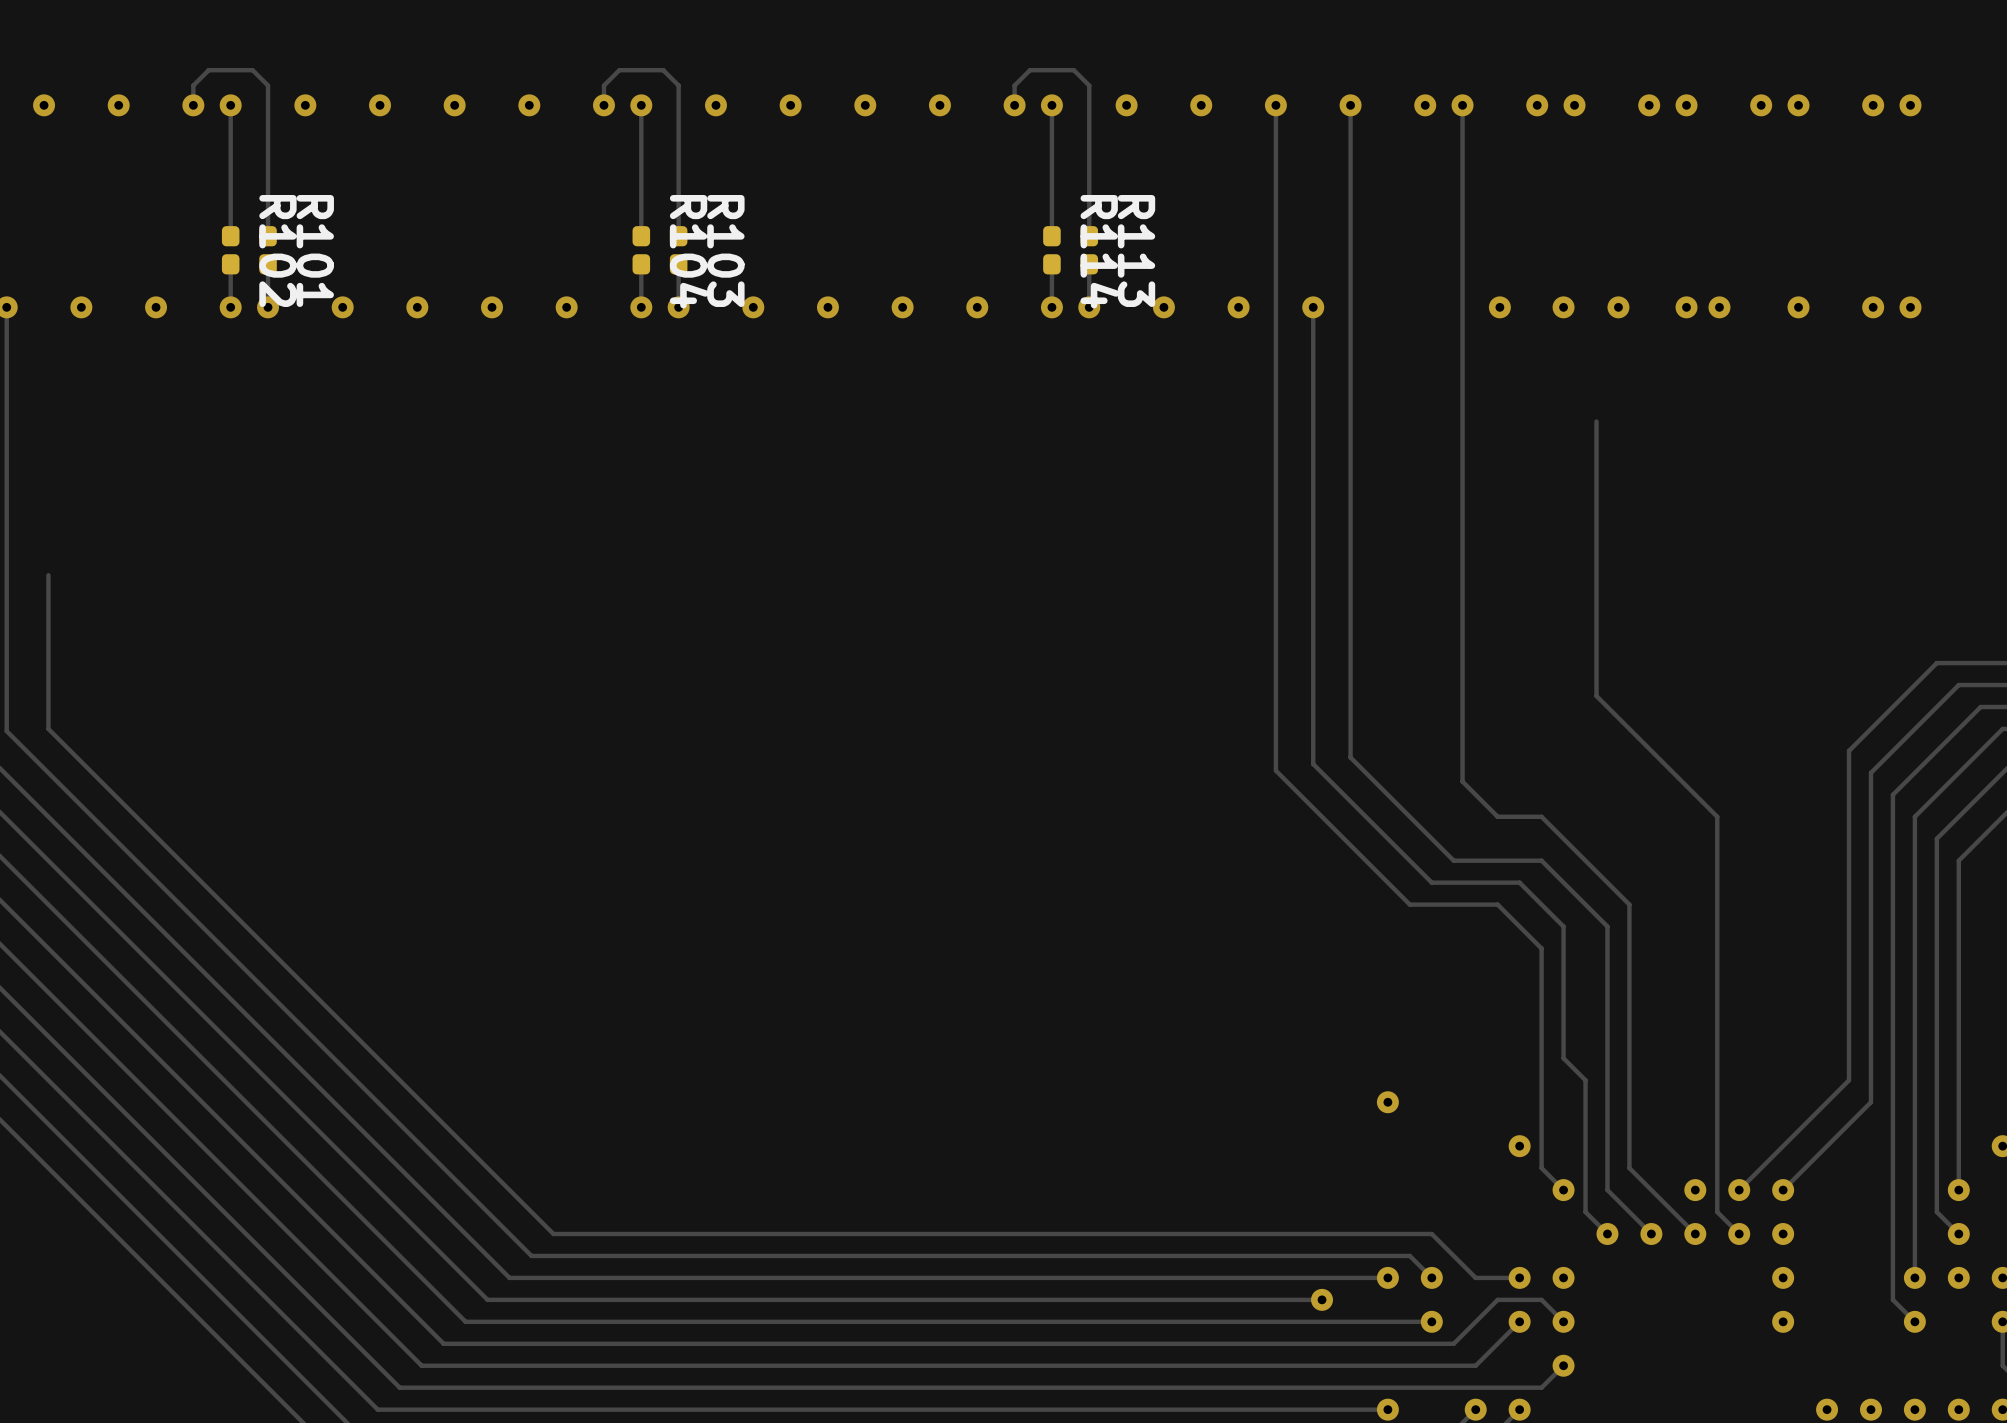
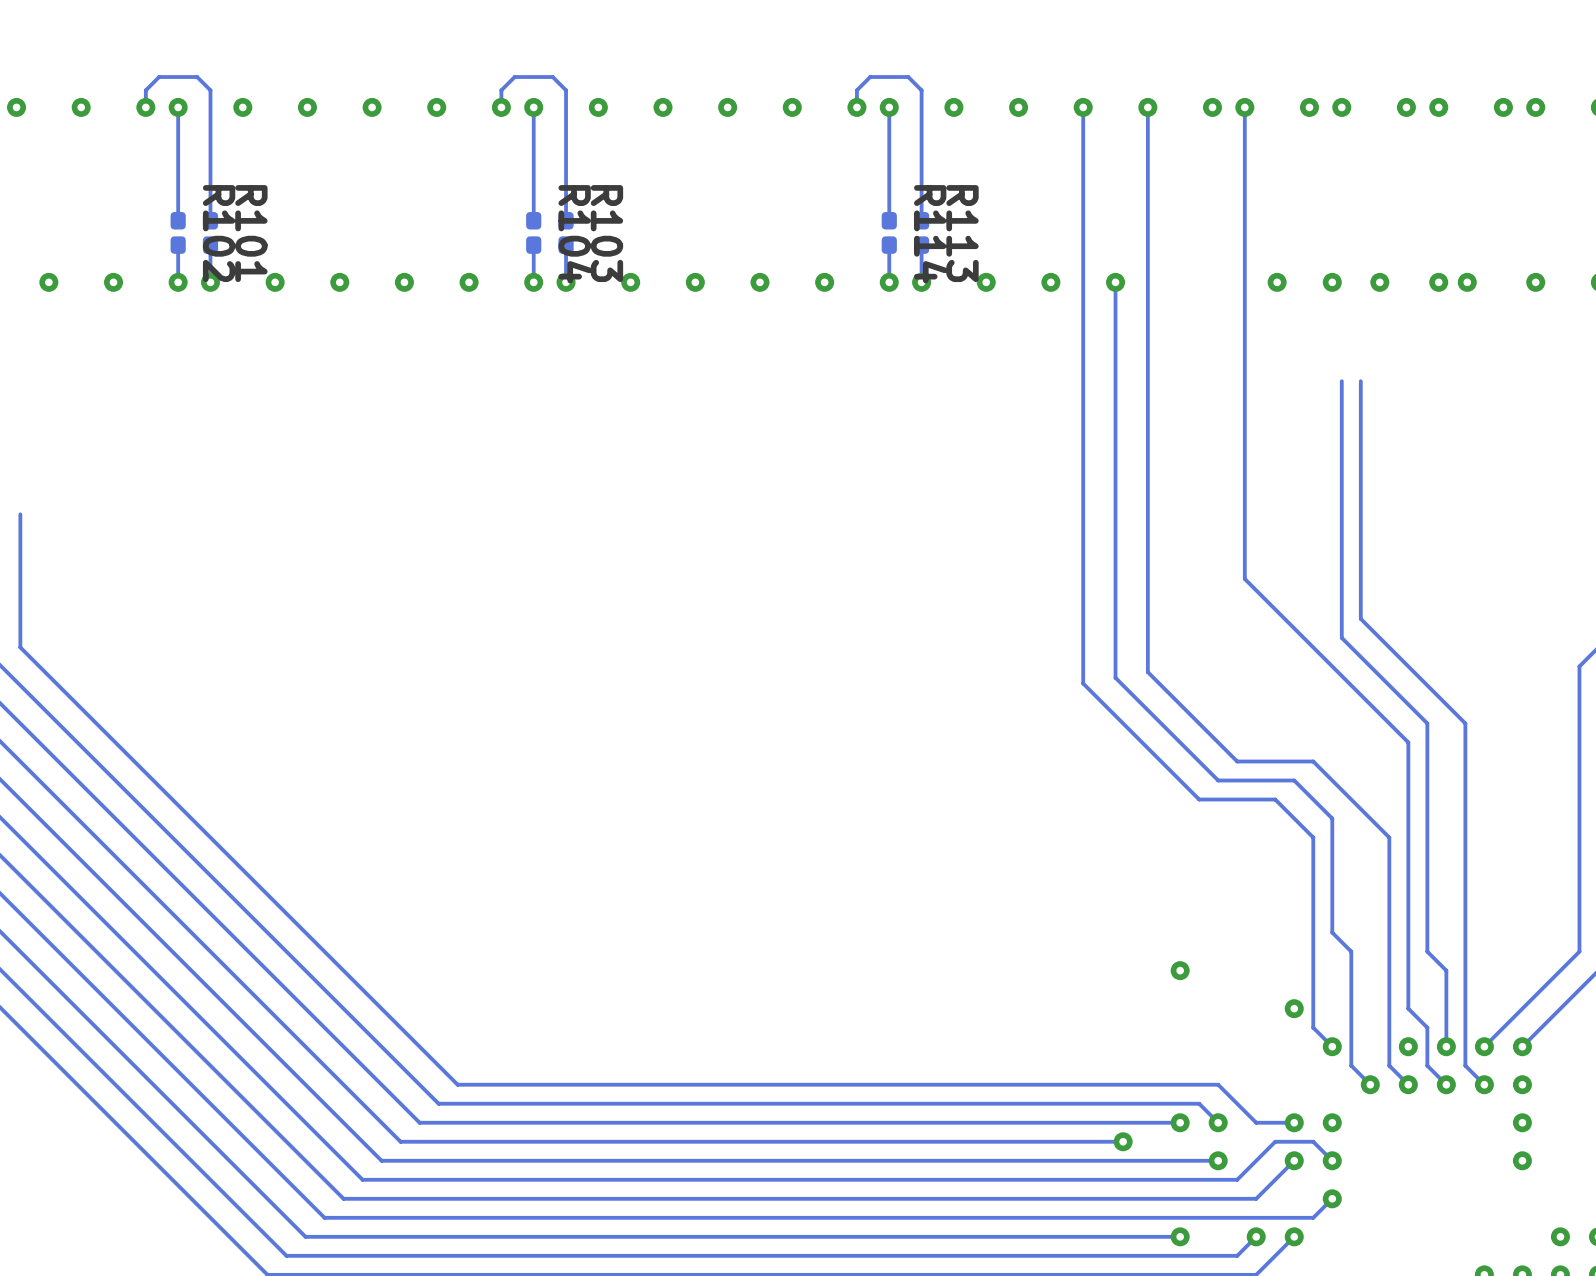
track: none -> (1341, 381) (1341, 637) (1427, 723) (1427, 951) (1446, 970) (1446, 1046)
track: (1462, 649) (1462, 781) (1497, 816) (1541, 816) (1629, 904) (1629, 948) -> (1244, 578) (1408, 742) (1408, 1008) (1427, 1027) (1427, 1065)
track: (1607, 926) (1607, 1190) (1629, 1212) -> (1370, 818) (1389, 837)
track: (1629, 1168) (1673, 1212) -> (1389, 1027) (1389, 1065)
via: none -> (1408, 1046)

